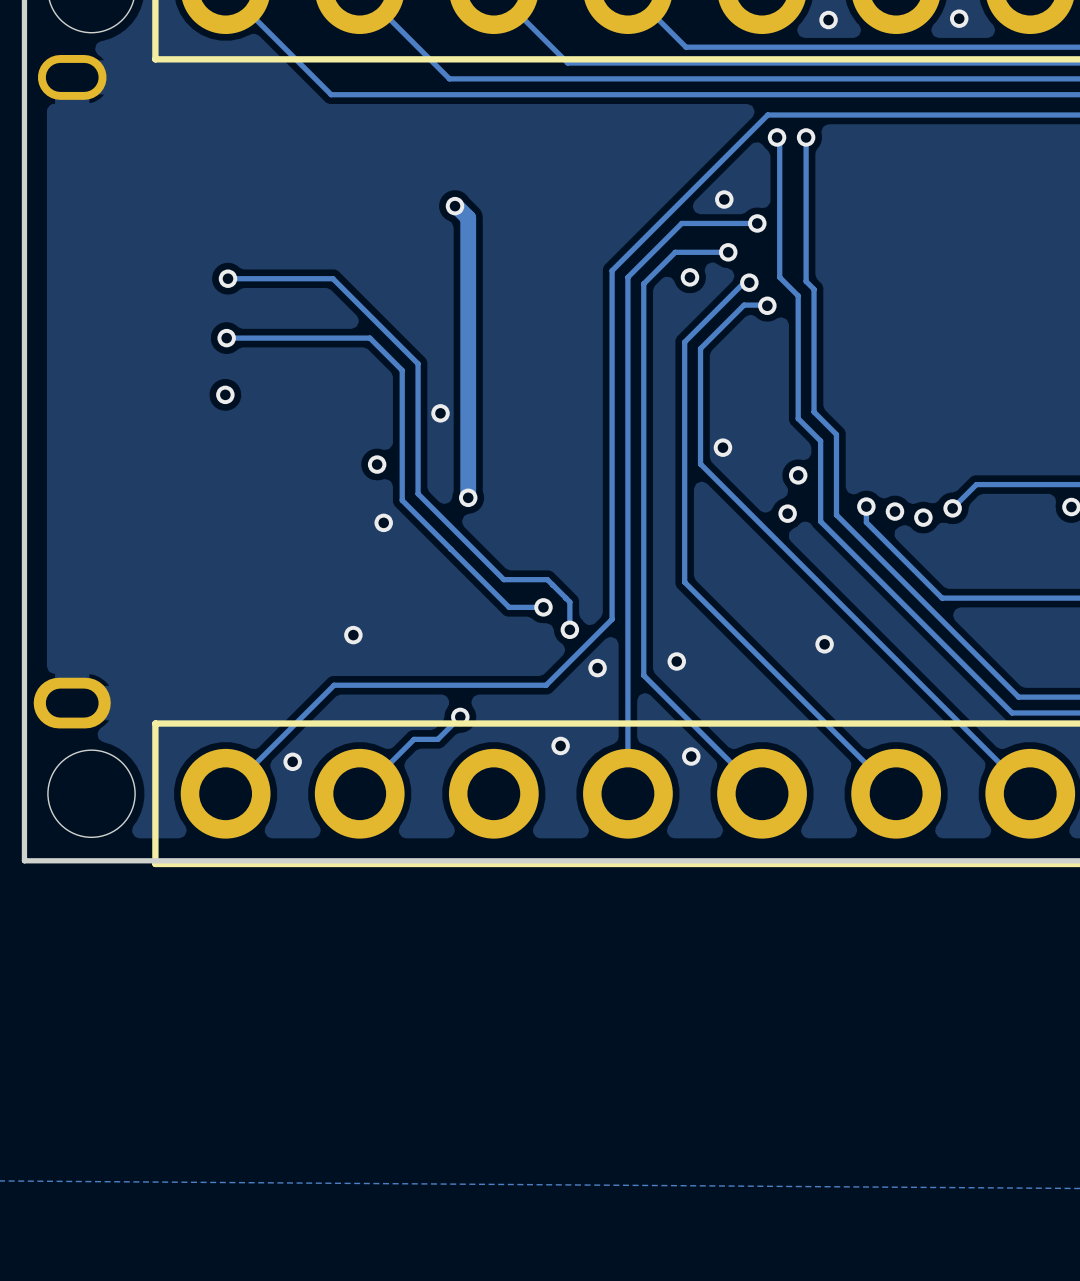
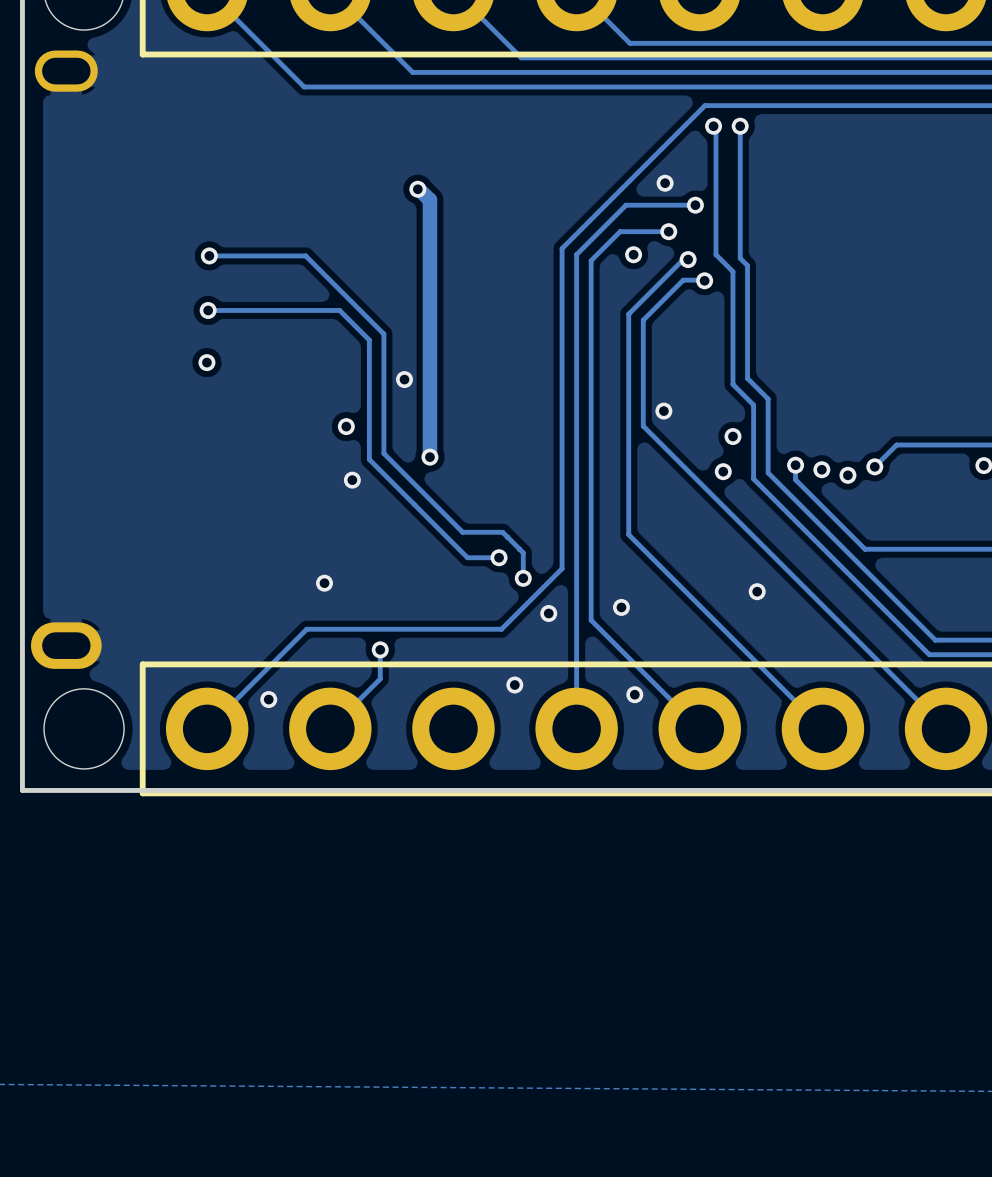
via: (959, 18) -> none
via: (828, 20) -> none
track: (460, 716) (437, 739) (414, 739) -> (380, 649) (380, 678)
via position: (460, 716) -> (380, 649)

